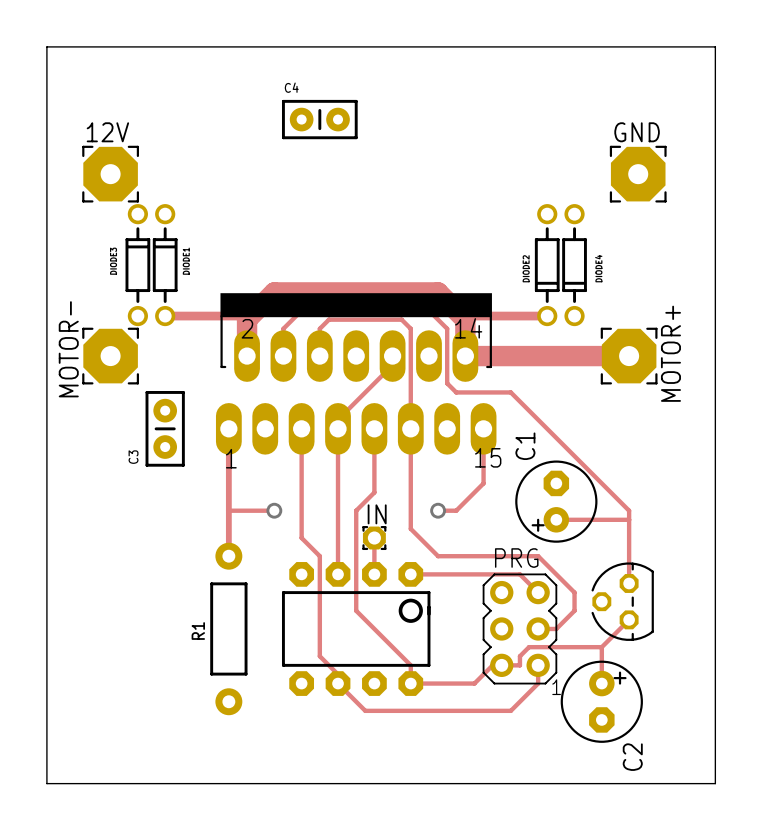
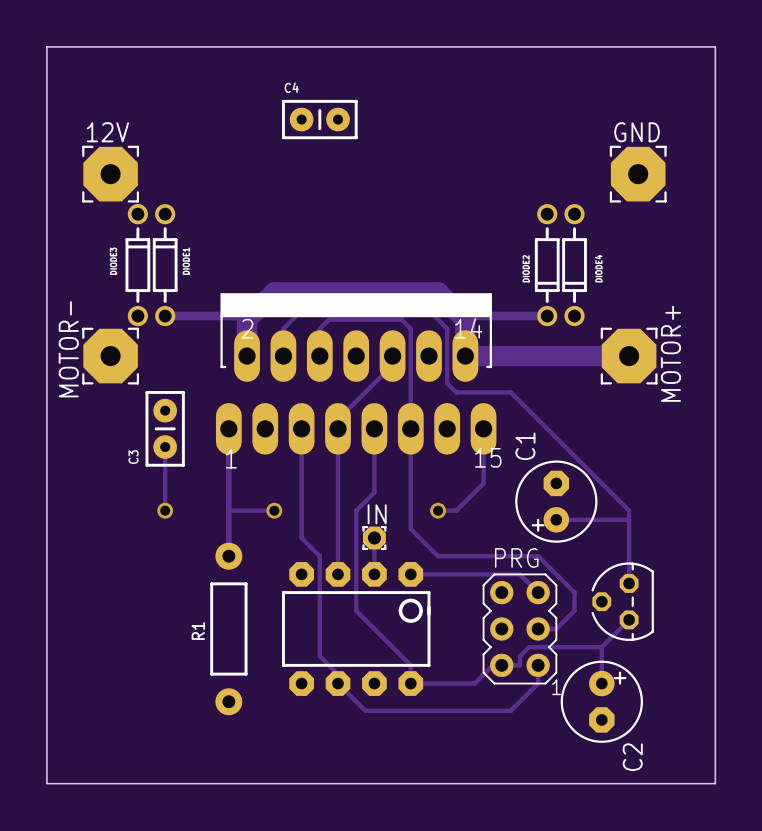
track: none -> (165, 447) (165, 510)
via: none -> (165, 510)

